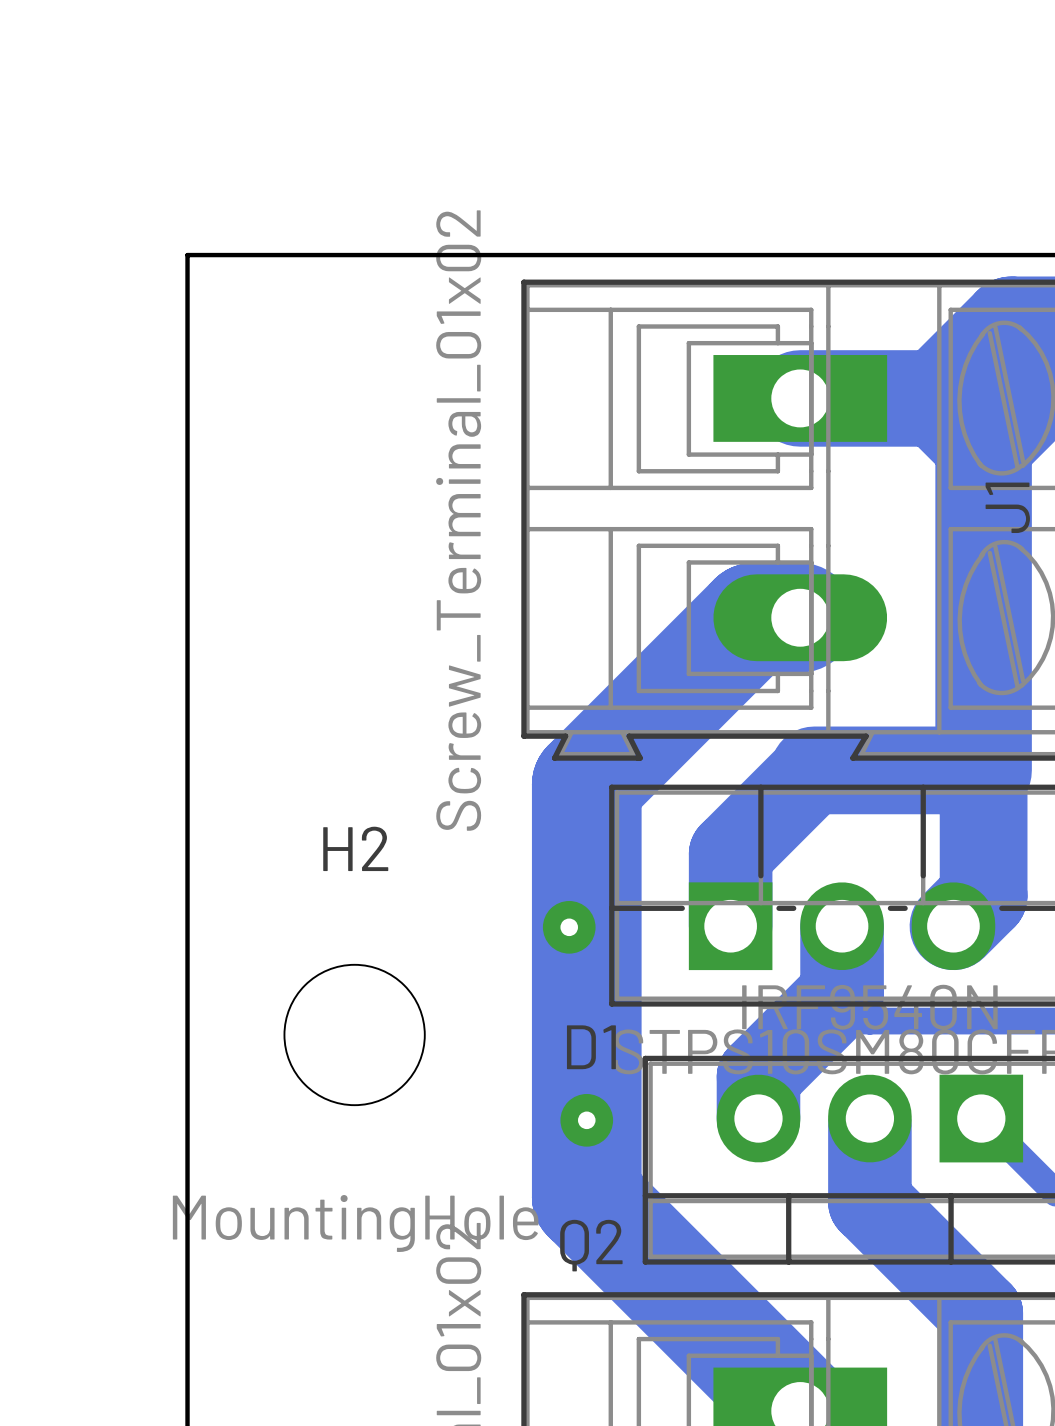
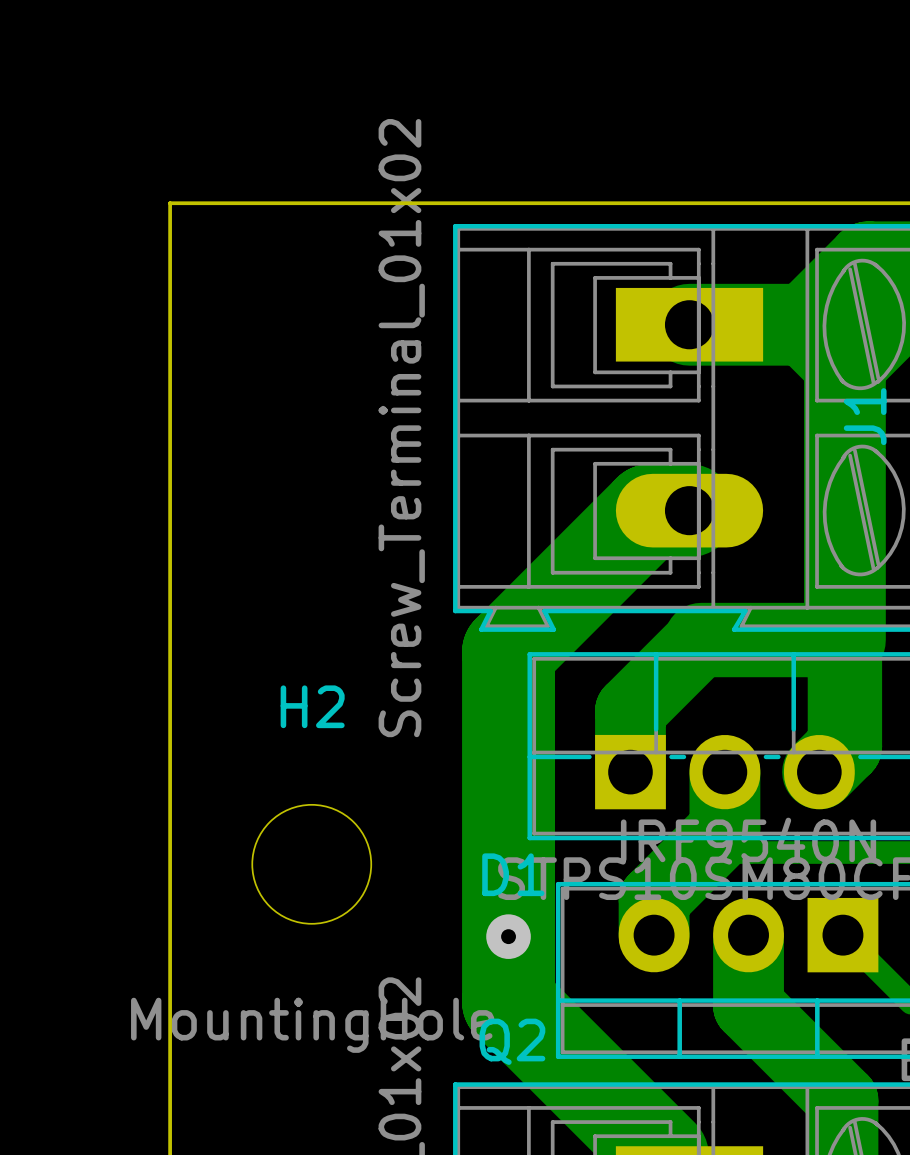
via: (569, 927) -> none

